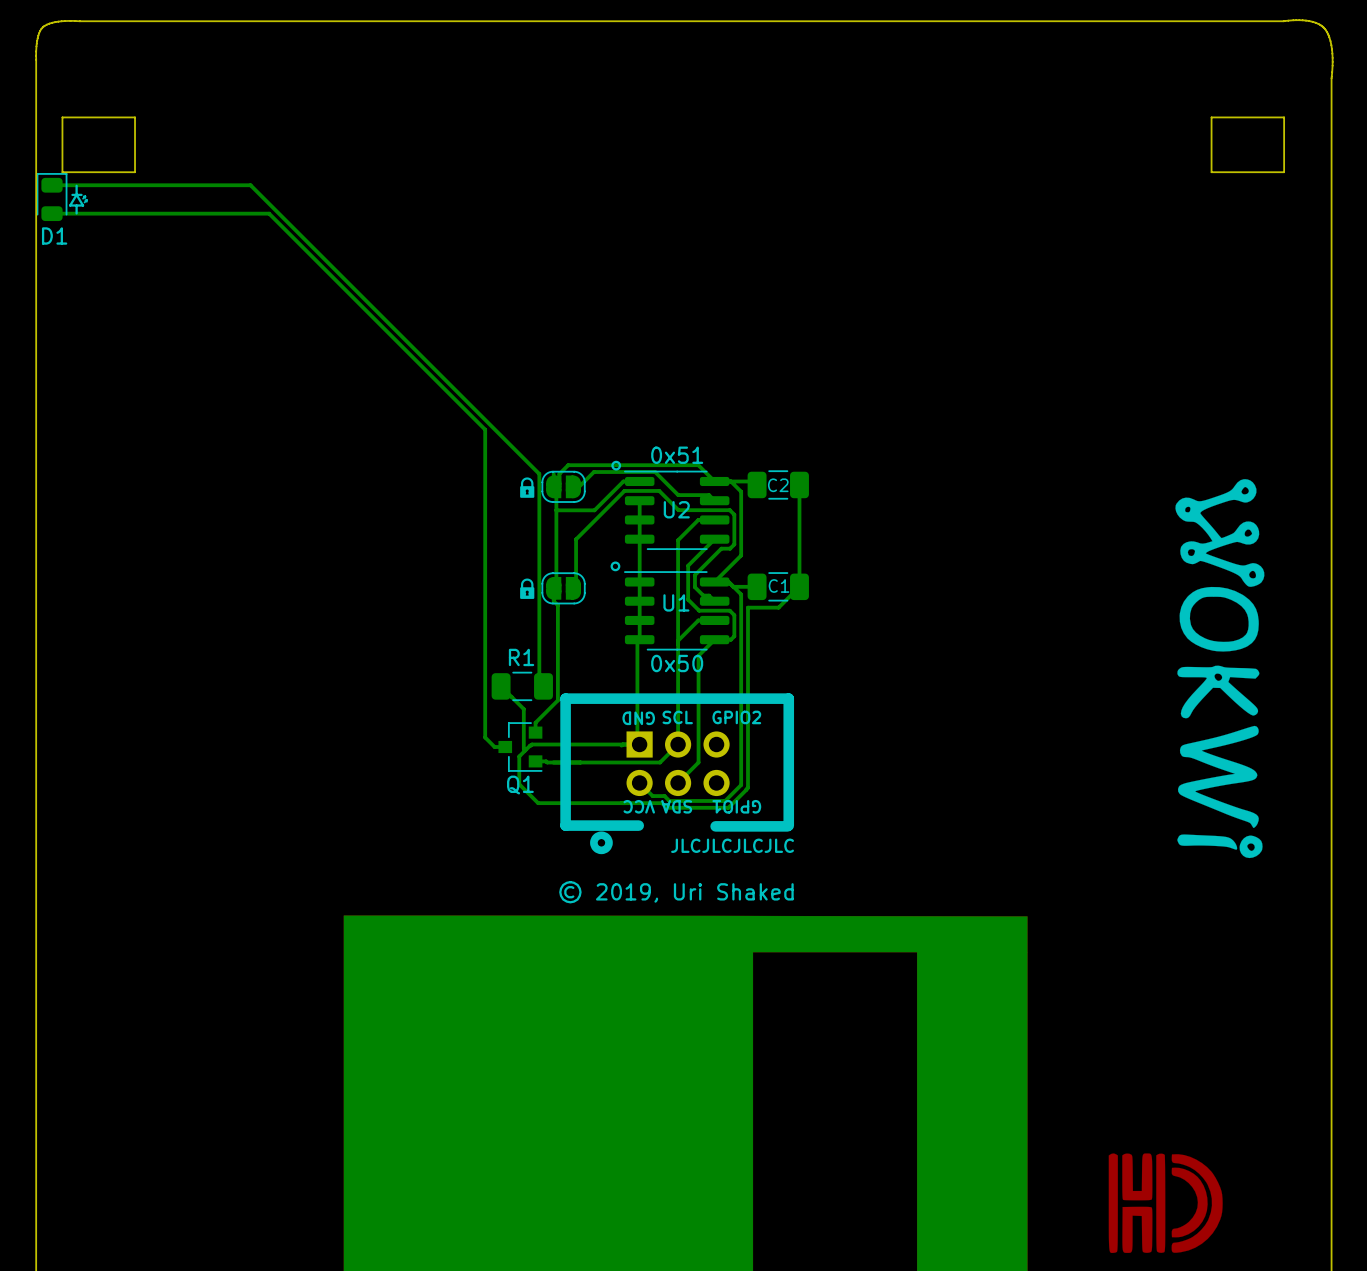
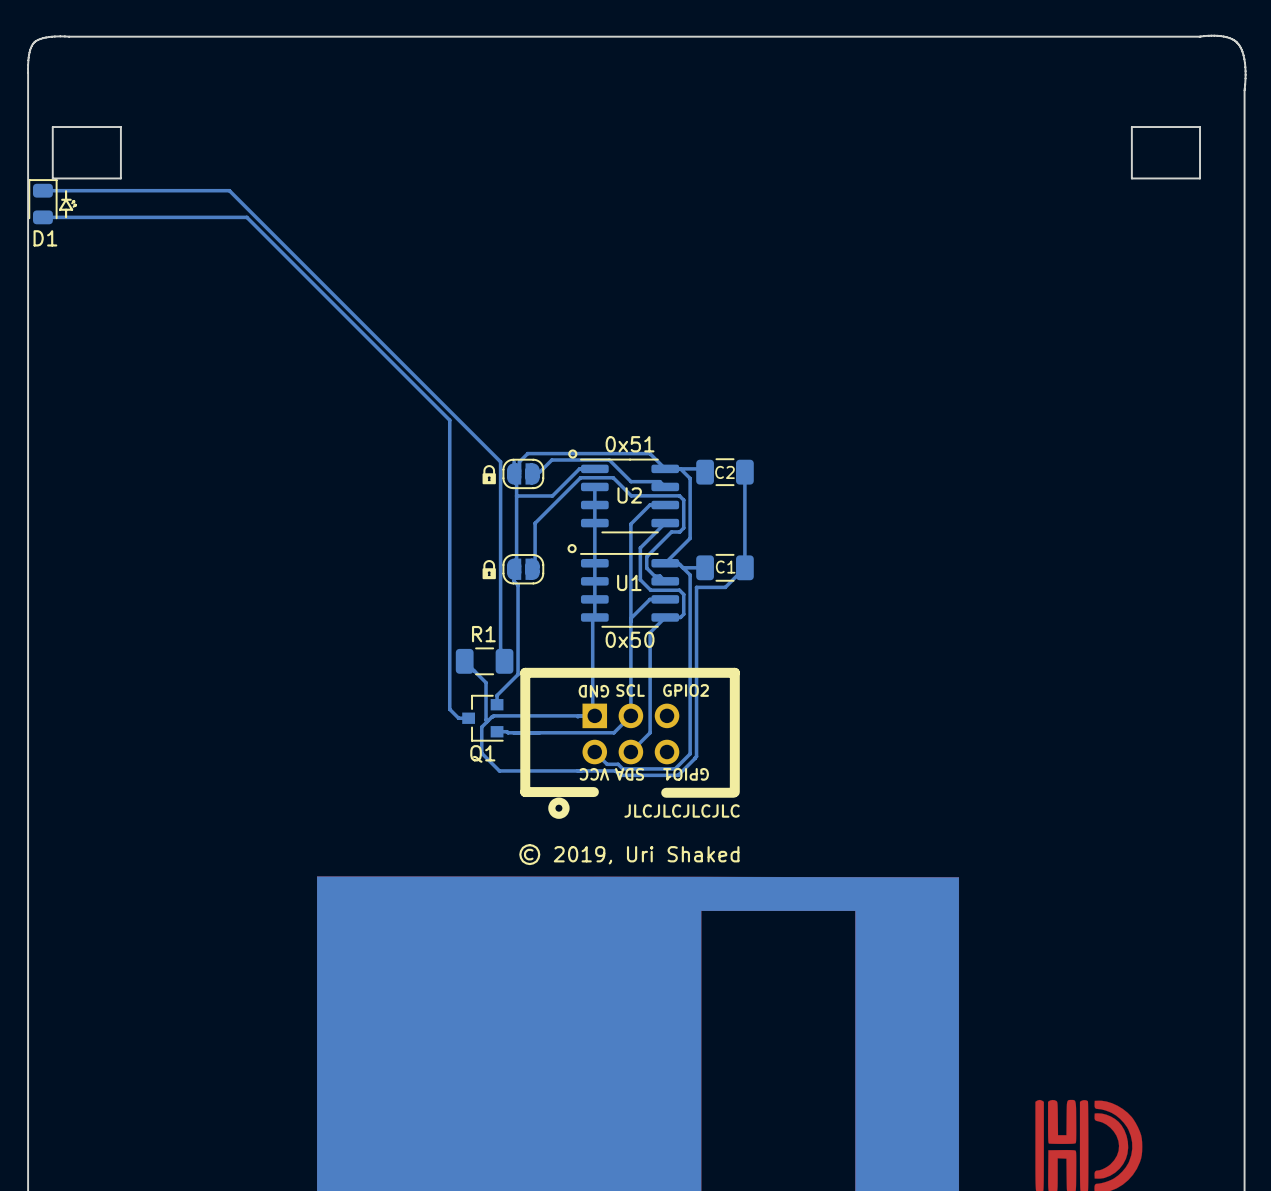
drawing: [1175, 479, 1265, 859] -> none

